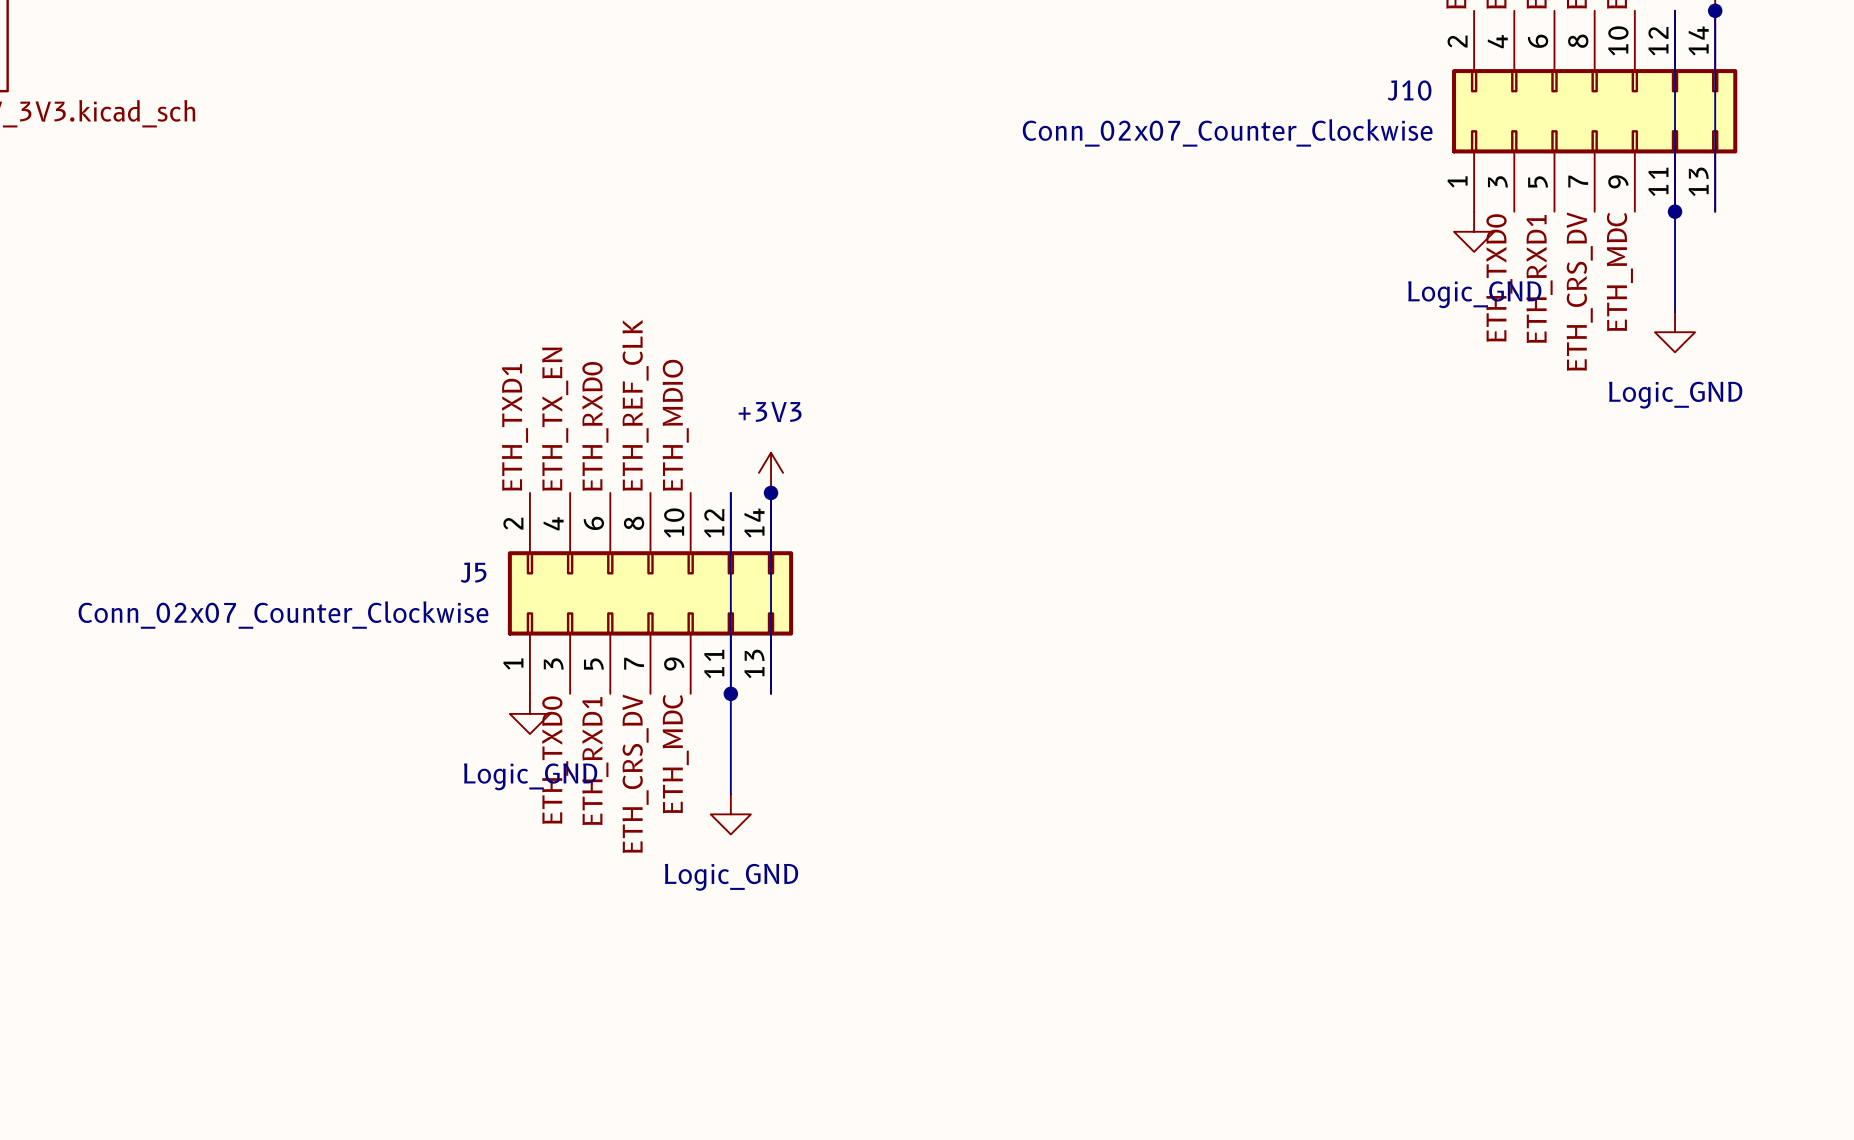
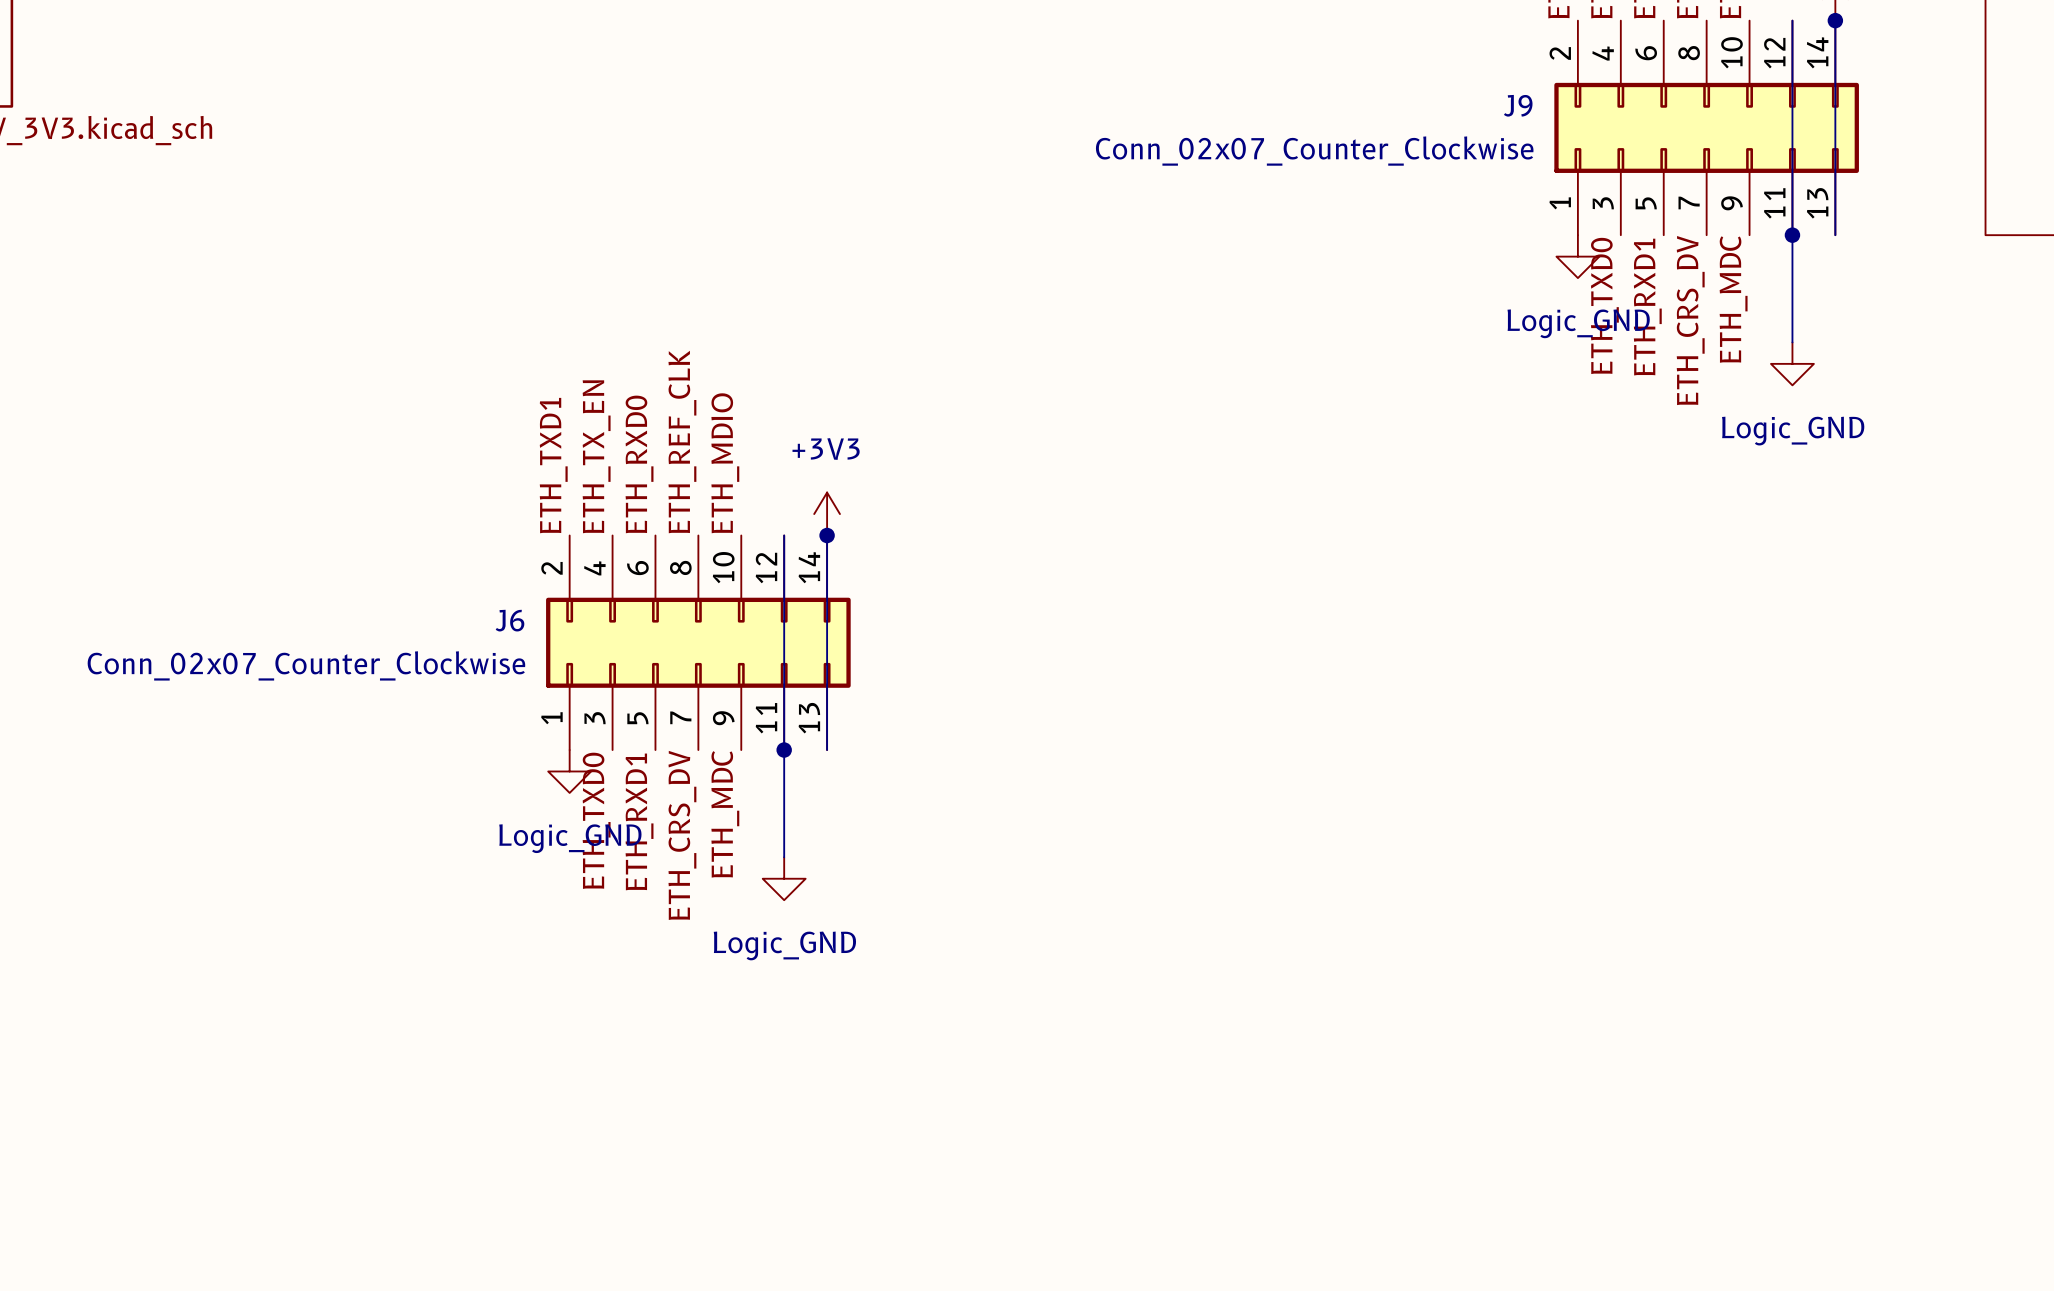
J10 name: J10 (1409, 90) -> J9 (1518, 105)
J5 name: J5 (473, 572) -> J6 (510, 620)

